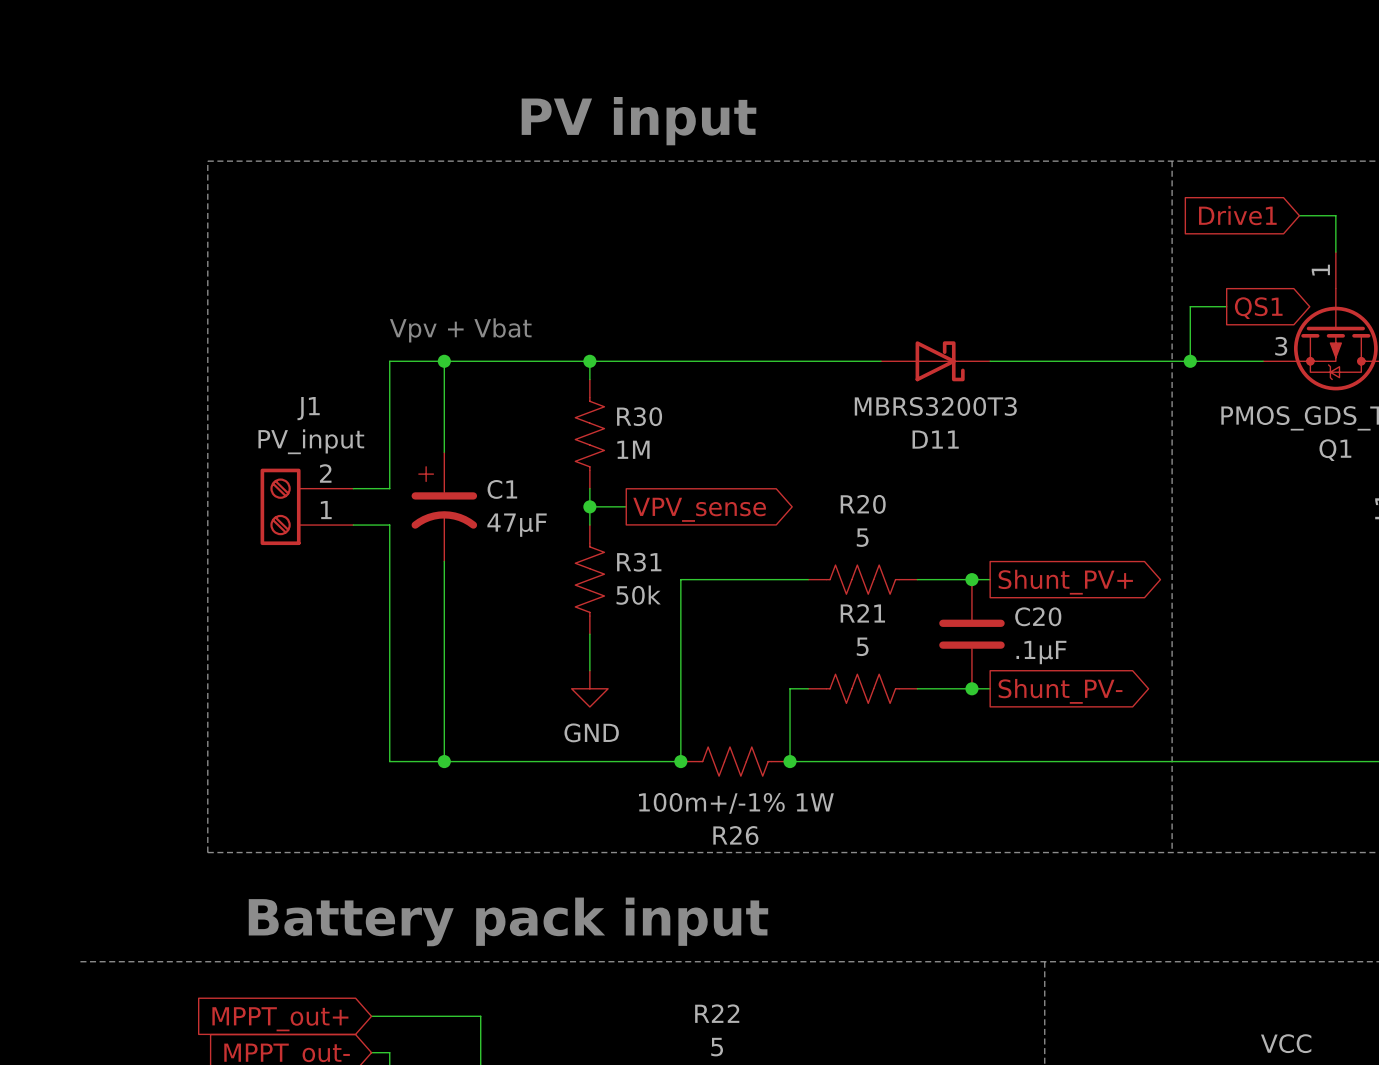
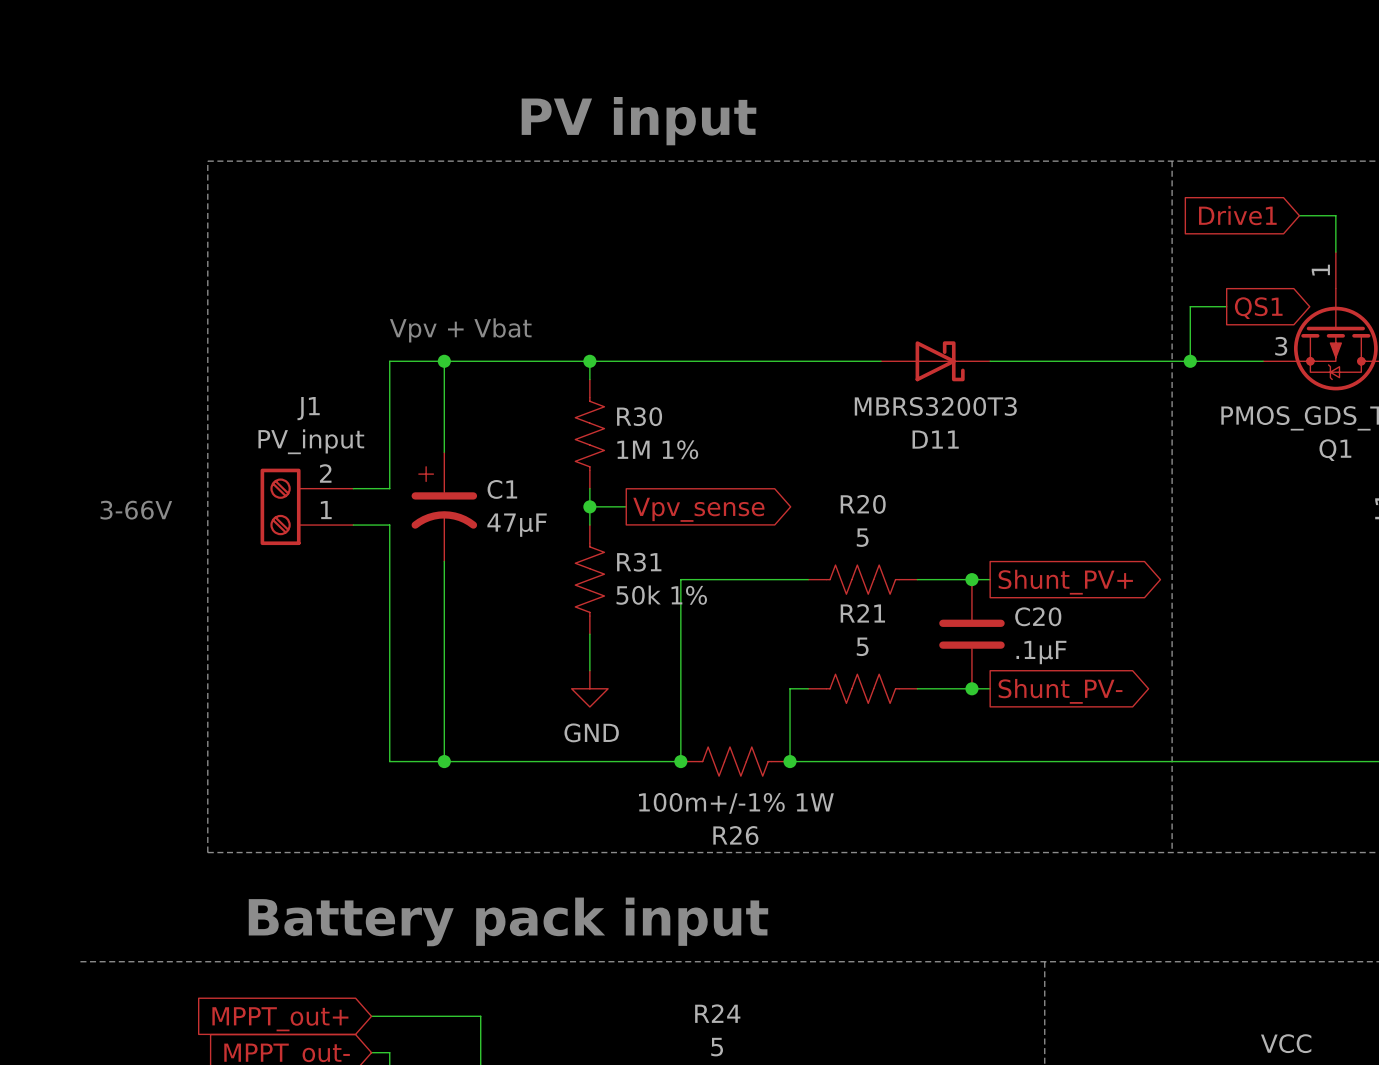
R30 value: 1M (633, 449) -> 1M 1% (657, 449)
global label: VPV_sense (699, 509) -> Vpv_sense (698, 509)
text: none -> 3-66V (136, 510)
R31 value: 50k (638, 595) -> 50k 1% (661, 595)
R22 name: R22 (717, 1013) -> R24 (717, 1013)

